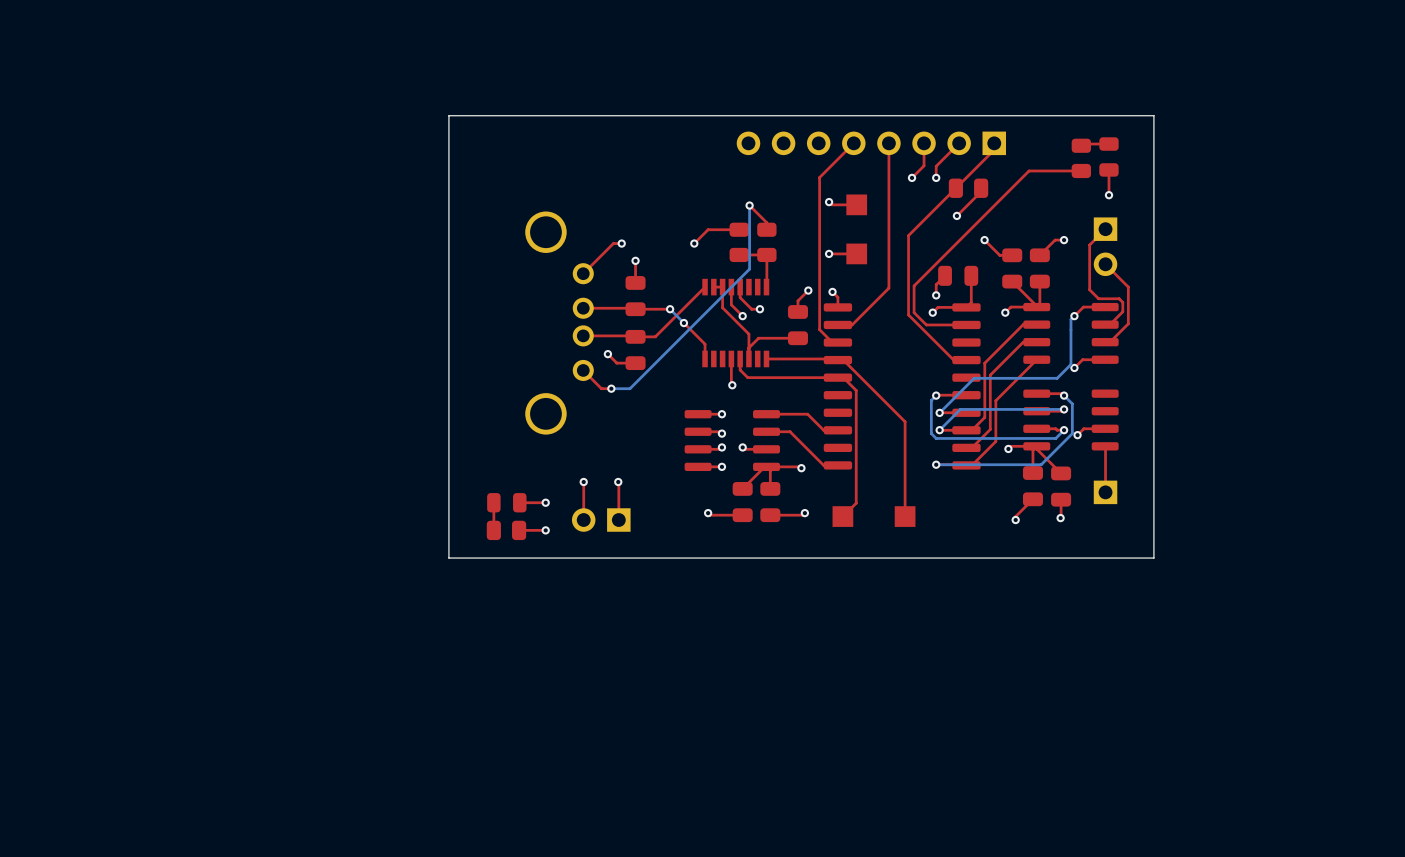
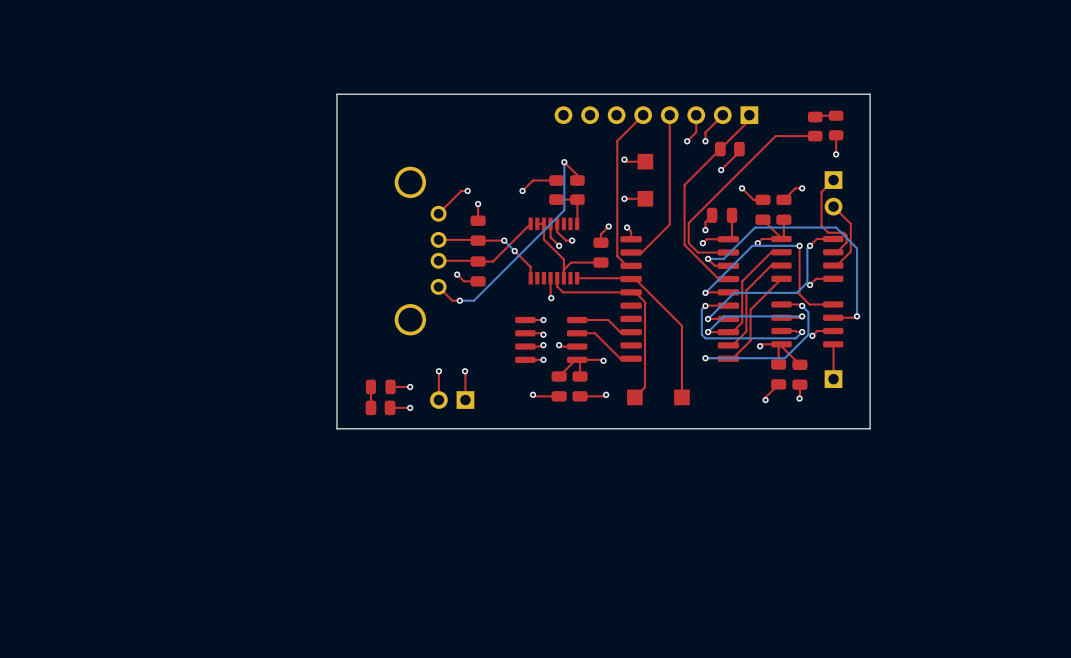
top track: none -> (799, 245) (799, 294) (809, 304) (833, 304)
bottom track: none -> (799, 245) (752, 245) (705, 292)
via: none -> (799, 245)
top track: none -> (708, 258) (714, 265) (728, 265)
bottom track: none -> (708, 258) (723, 258) (755, 227) (836, 227) (857, 248) (857, 316)
via: none -> (708, 258)
top track: none -> (728, 292) (705, 292)
via: none -> (705, 292)
top track: none -> (857, 316) (833, 317)
via: none -> (857, 316)

